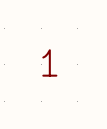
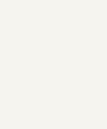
text: 1 (49, 62) -> none

